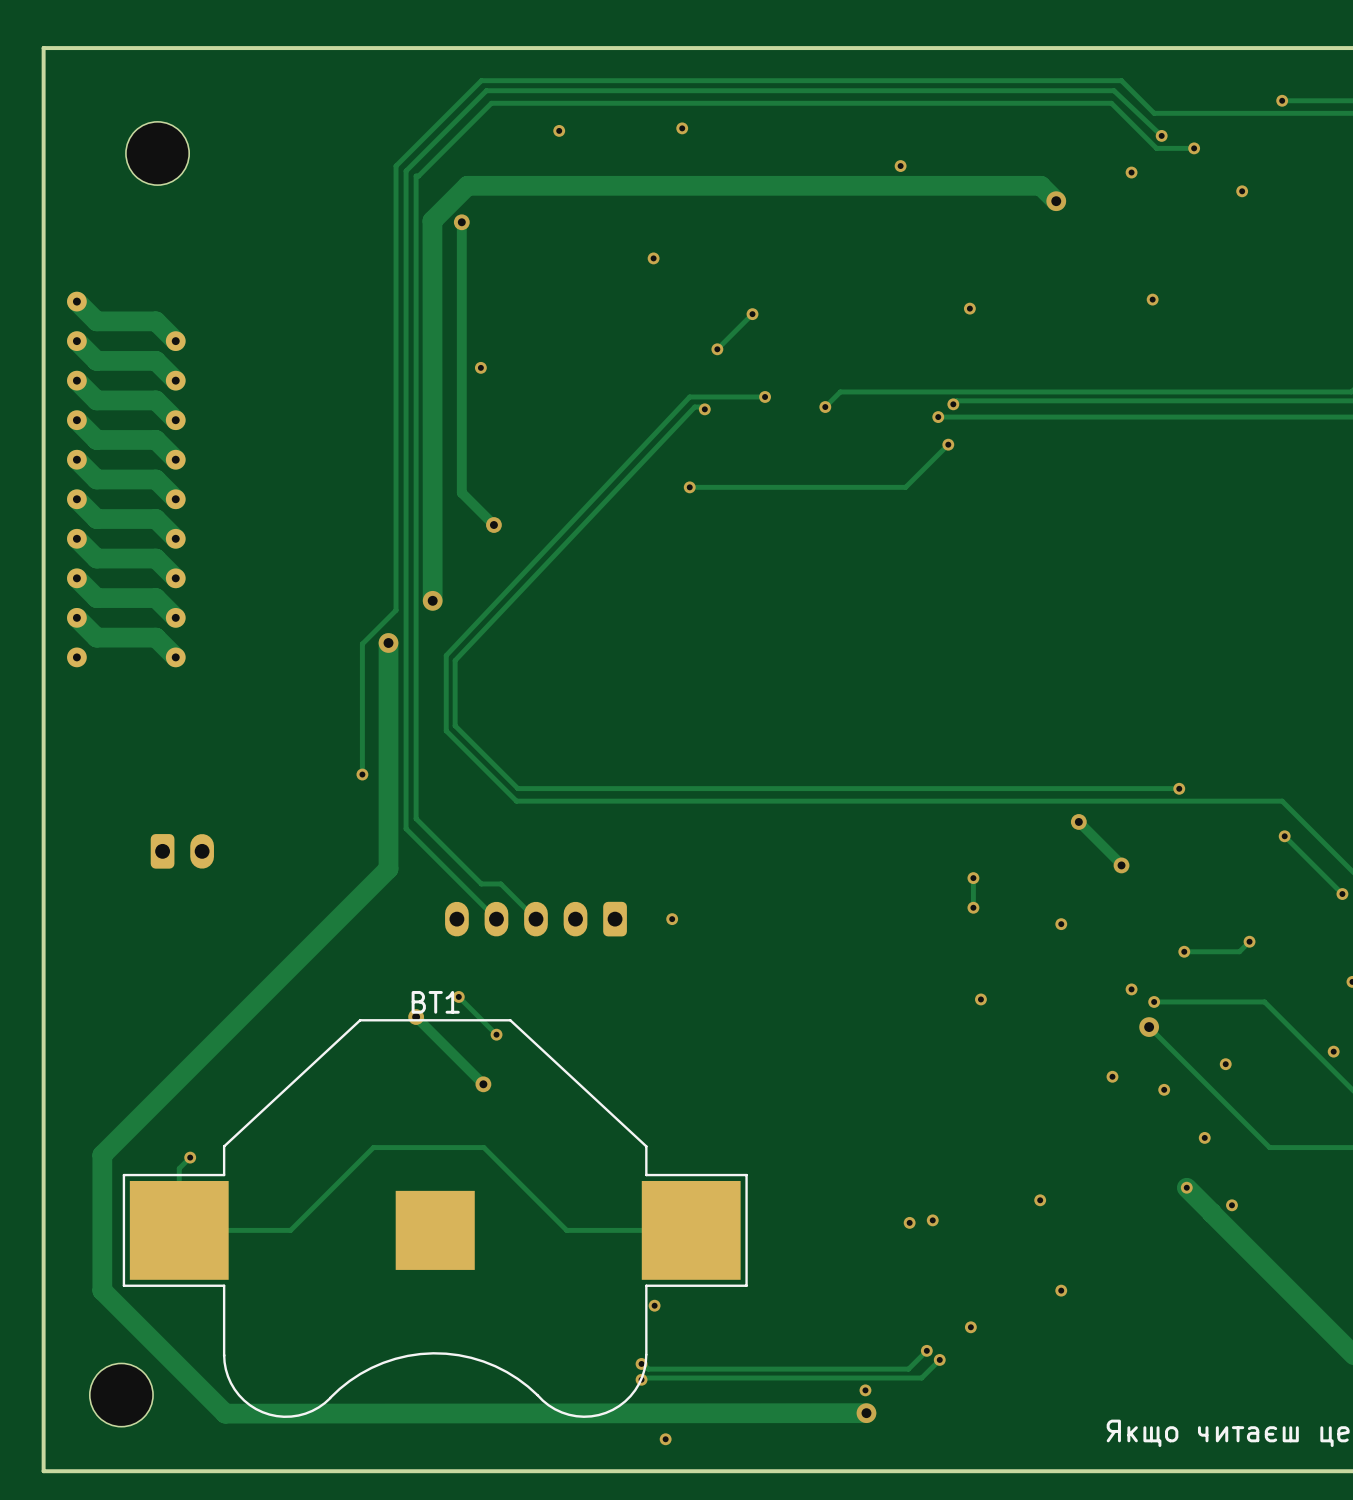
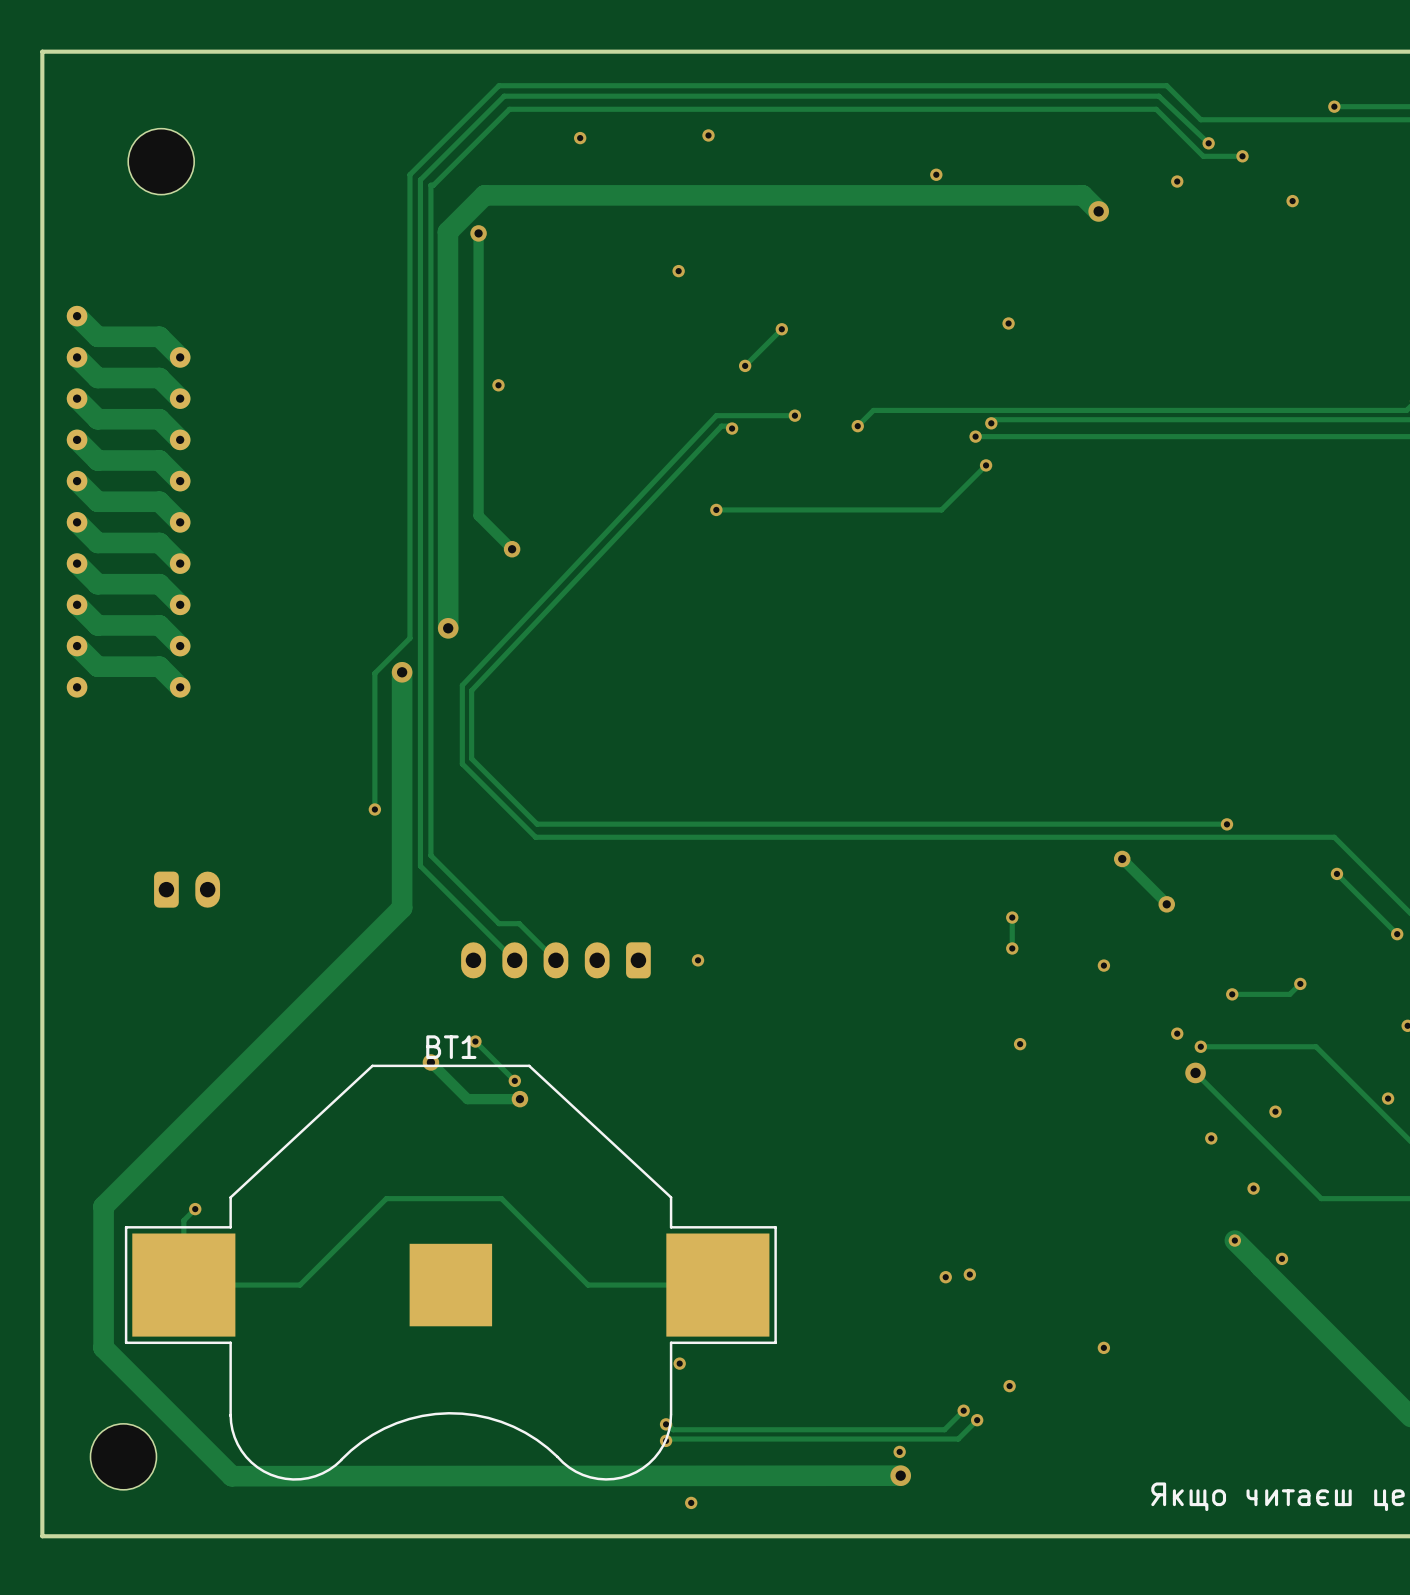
via: (1152, 299) -> none
track: (451, 1052) (483, 1084) -> (467, 1099) (519, 1099)
via: (1112, 1076) -> none
via position: (483, 1084) -> (519, 1099)
via: (1040, 1200) -> none

